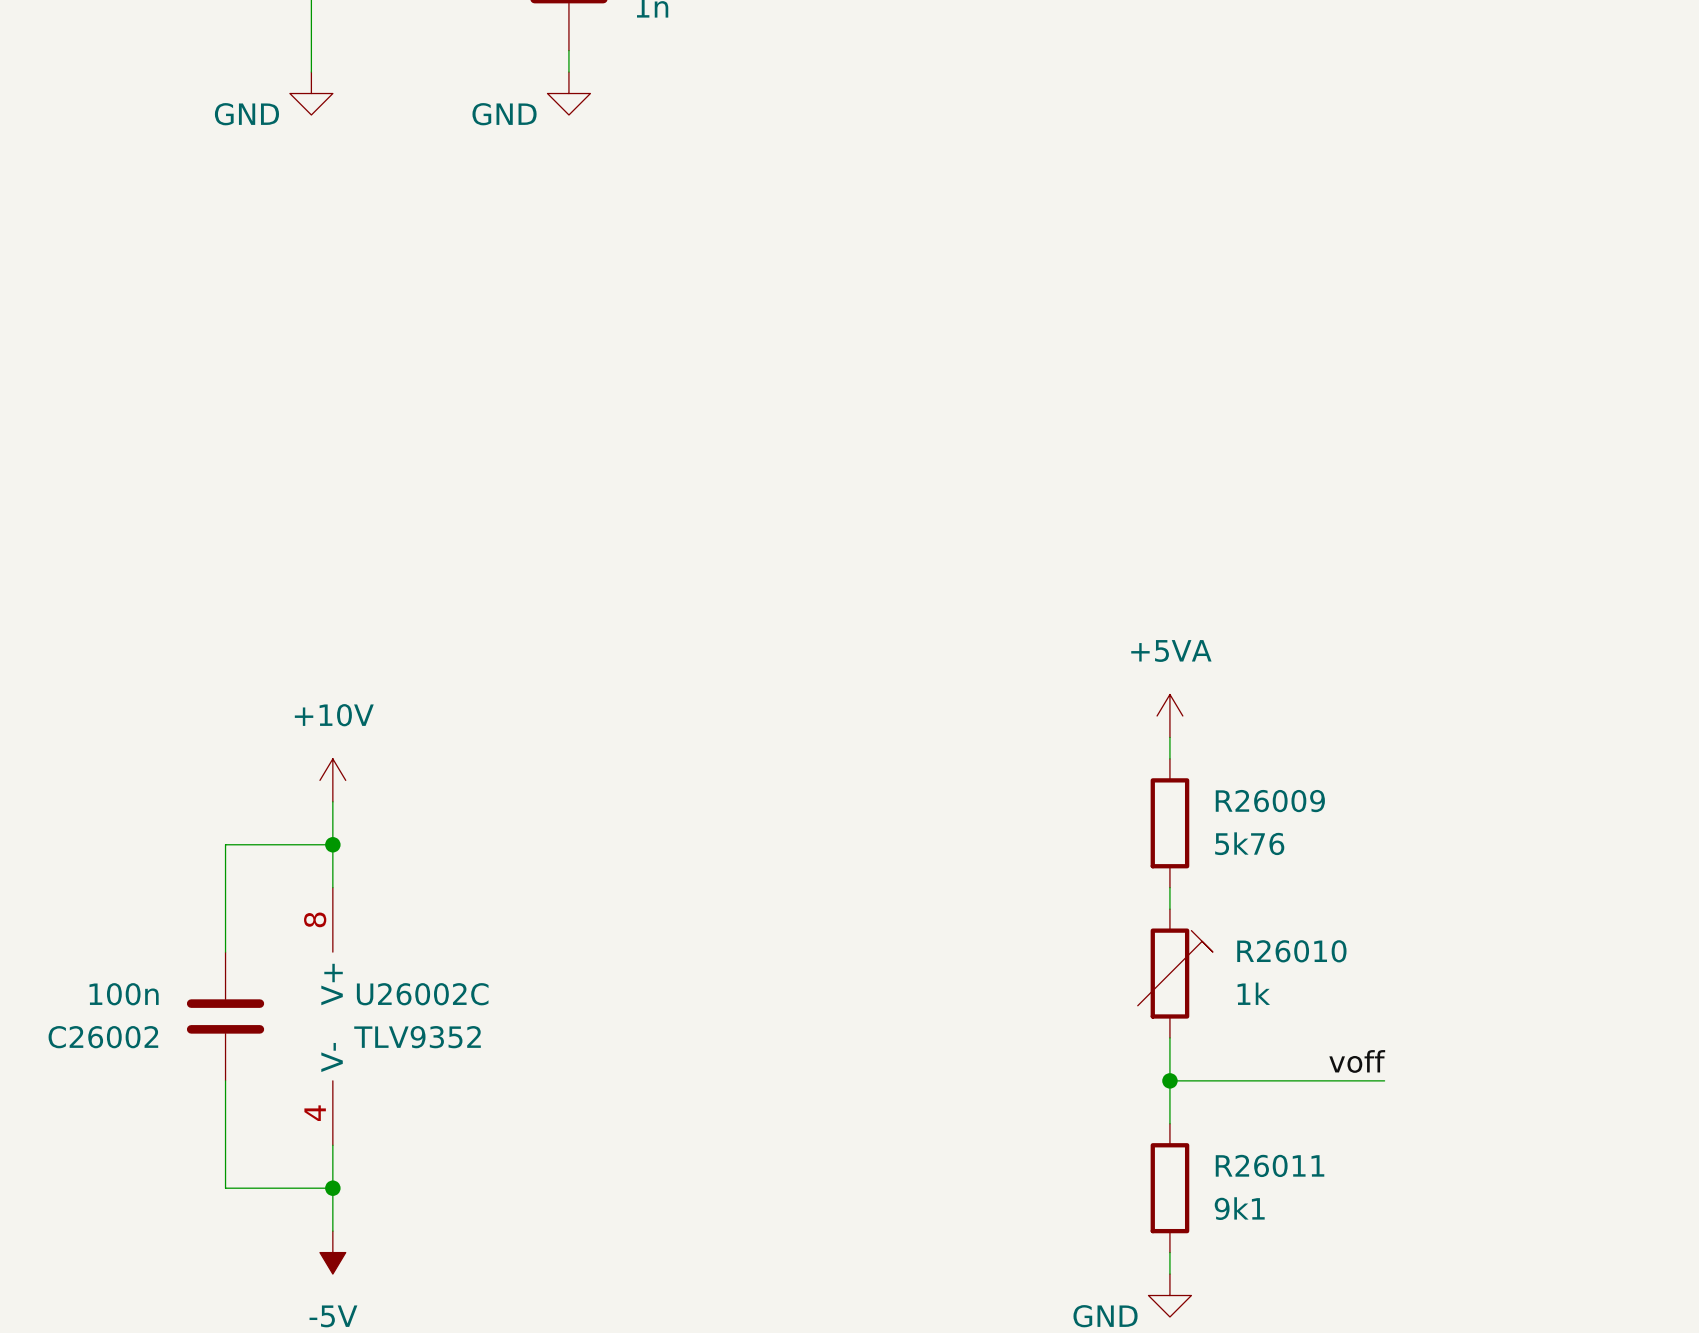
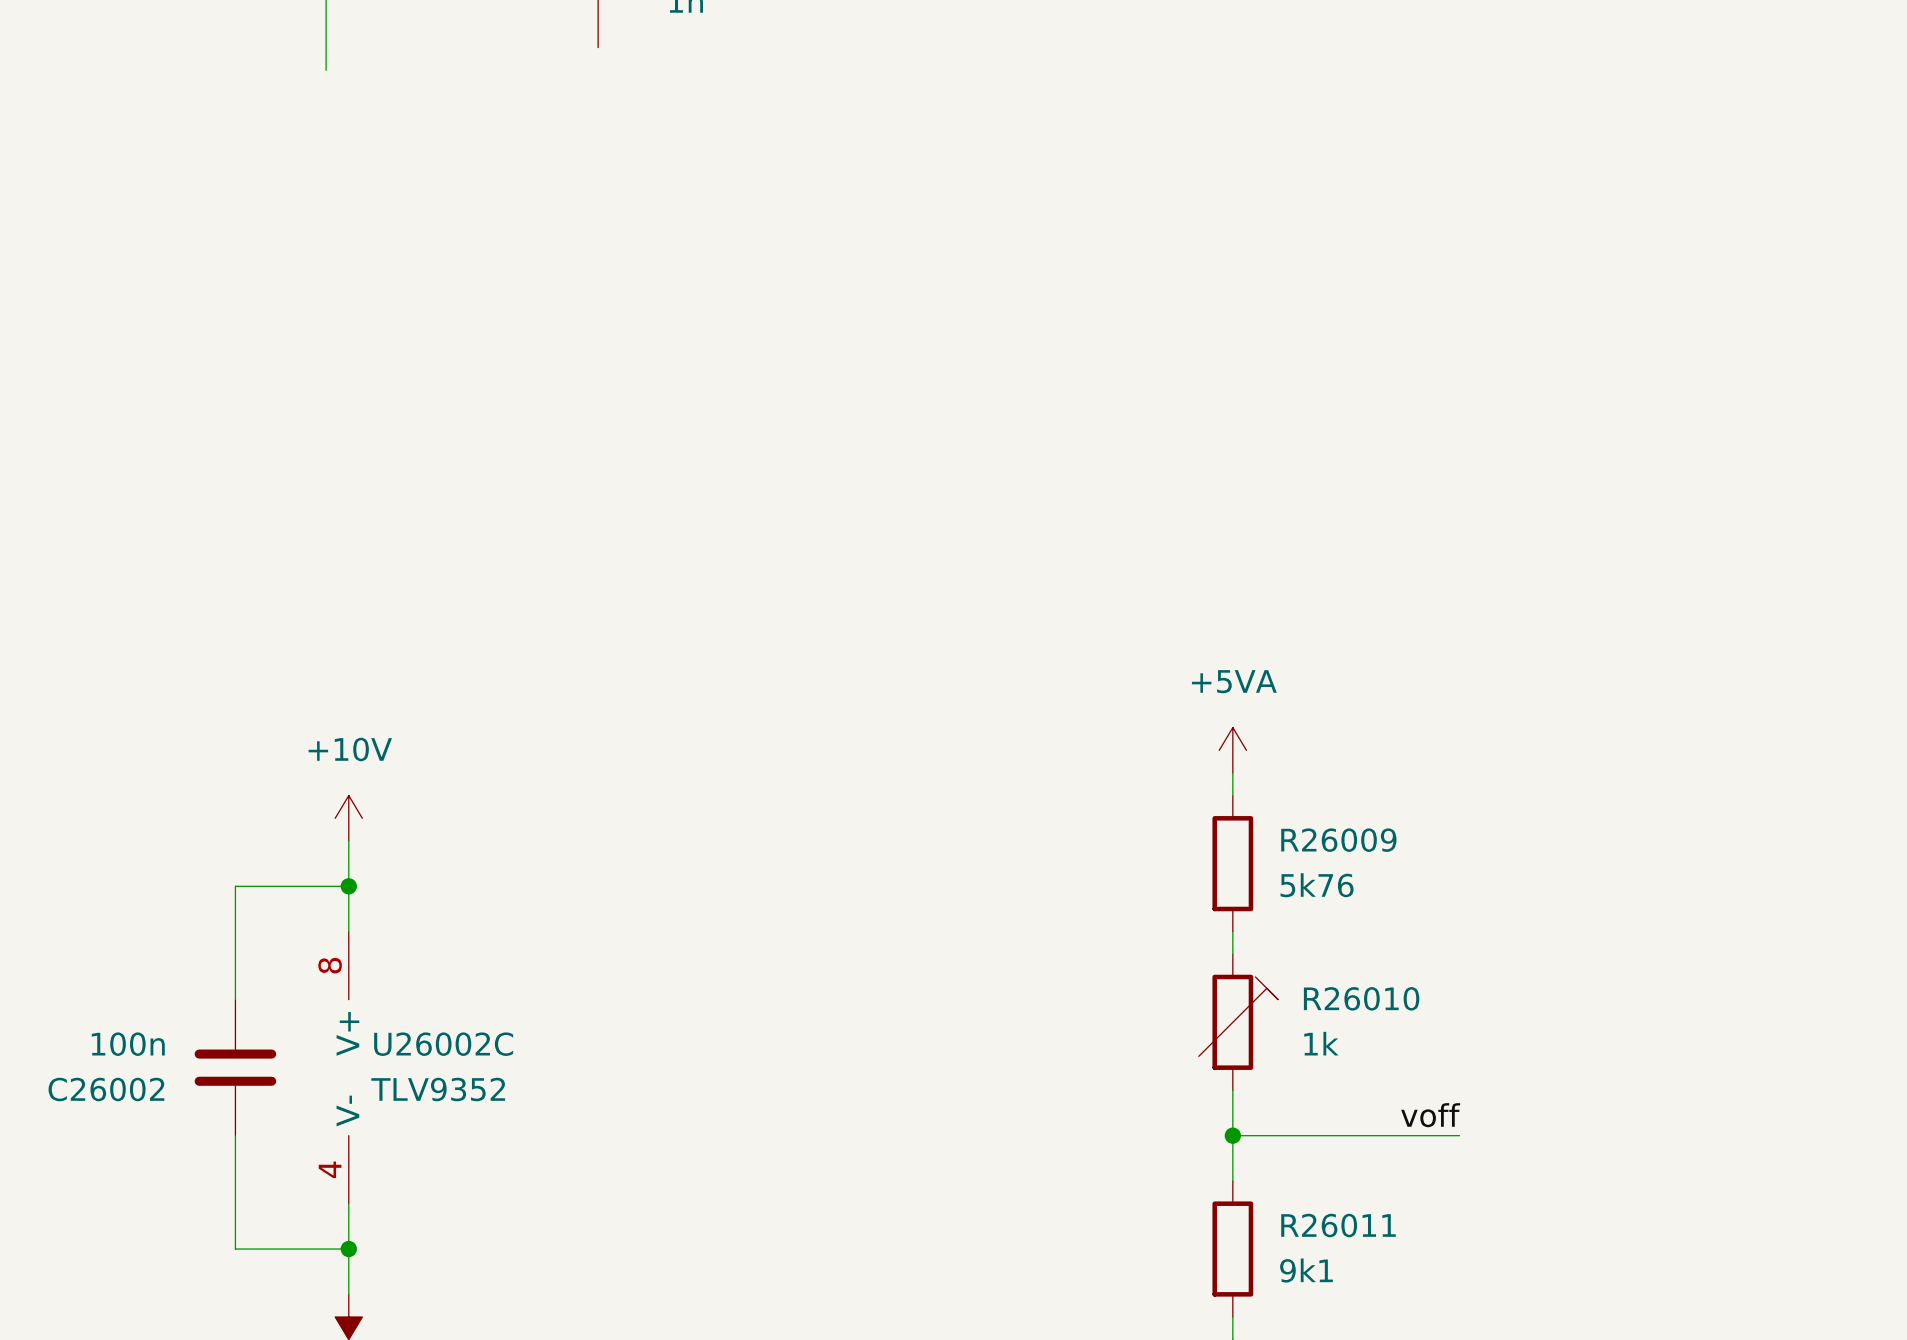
wire: (568, 50) (568, 72) -> none
power symbol: GND (311, 93) -> none
power symbol: GND (568, 93) -> none

